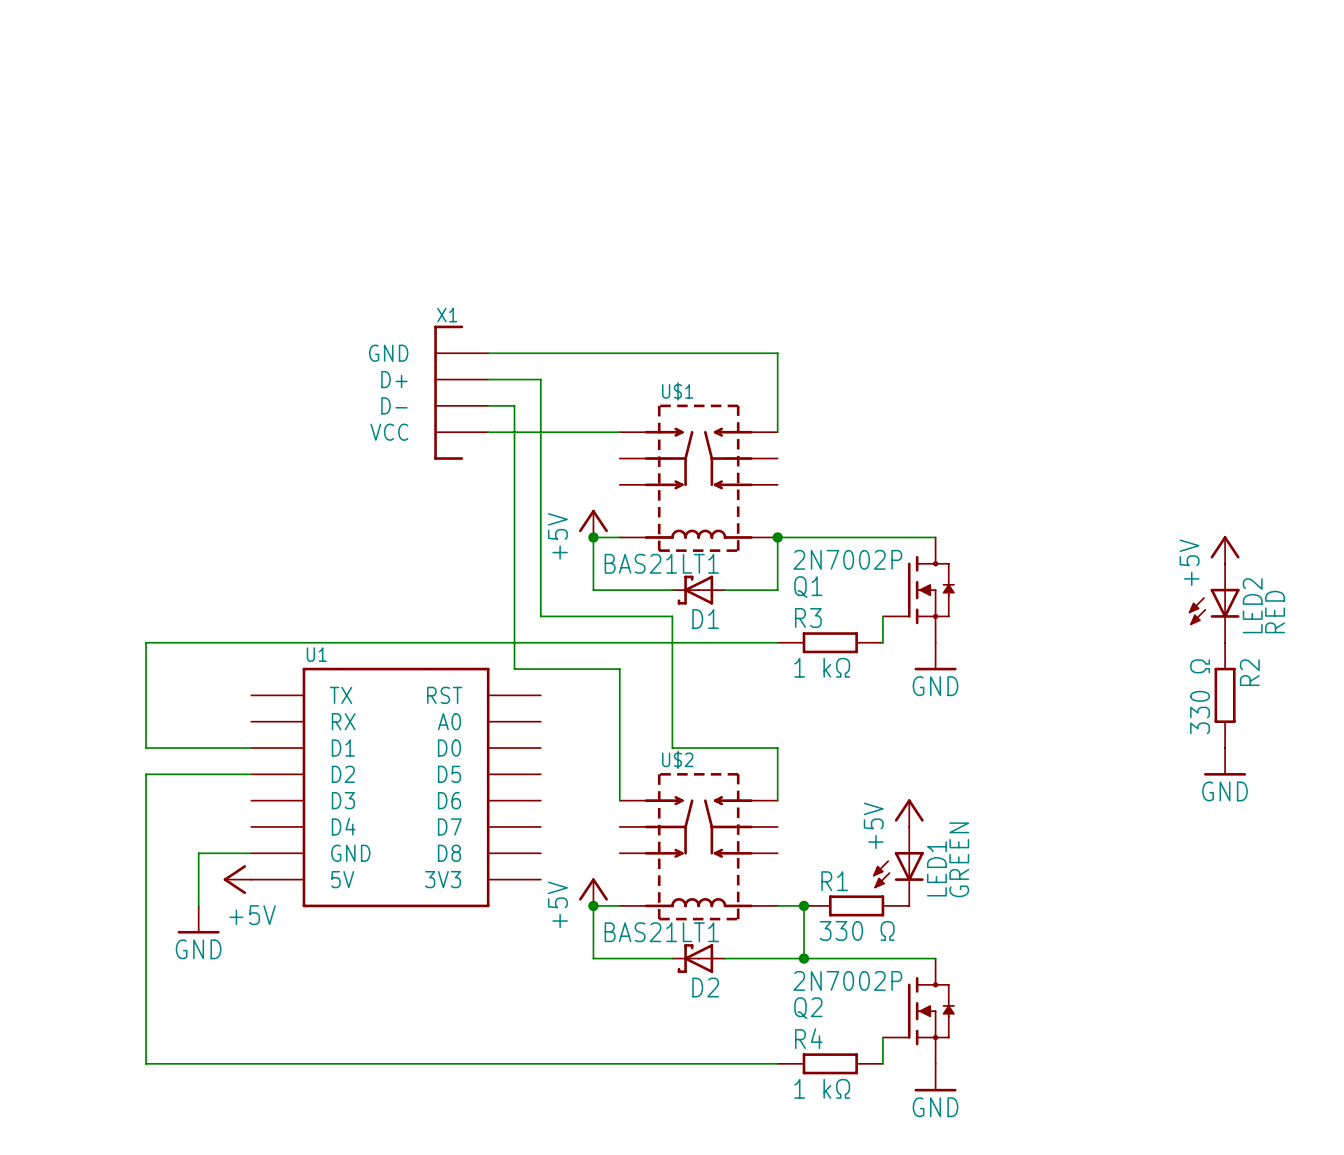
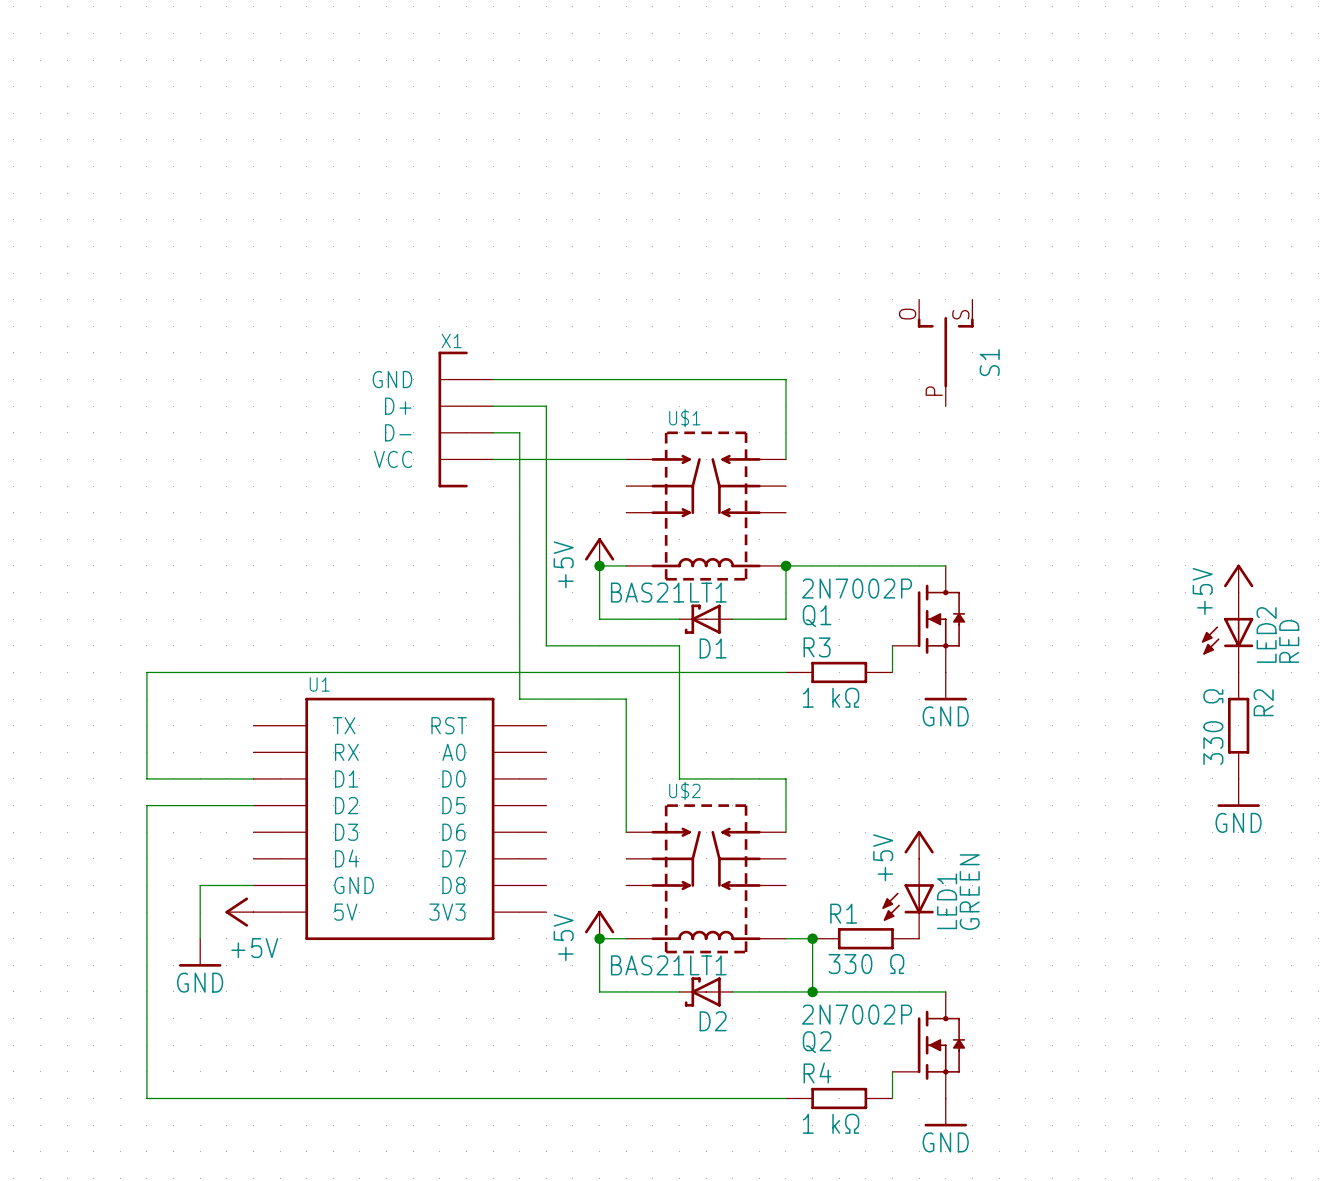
S1: none -> (945, 352)

